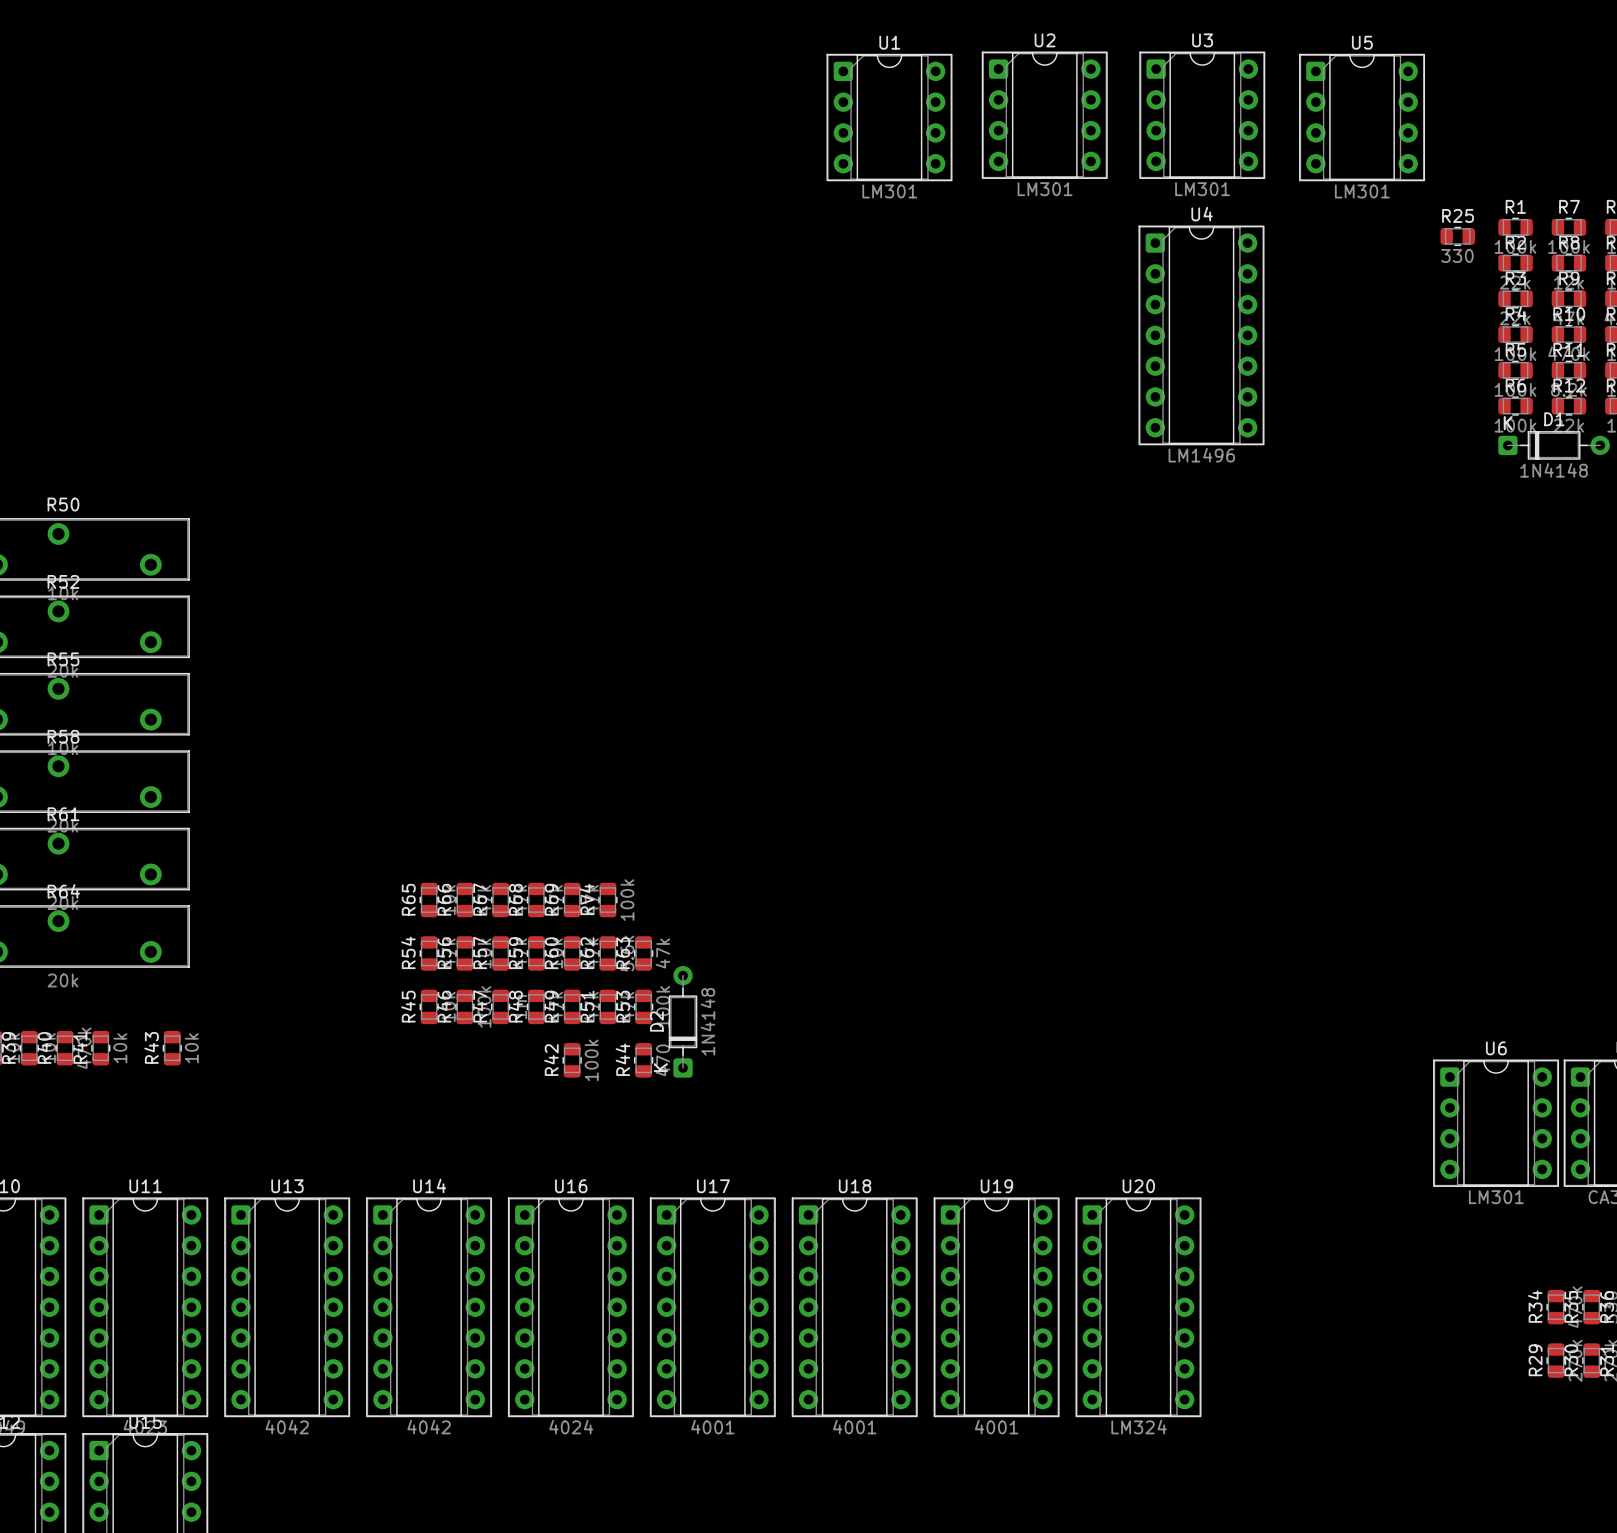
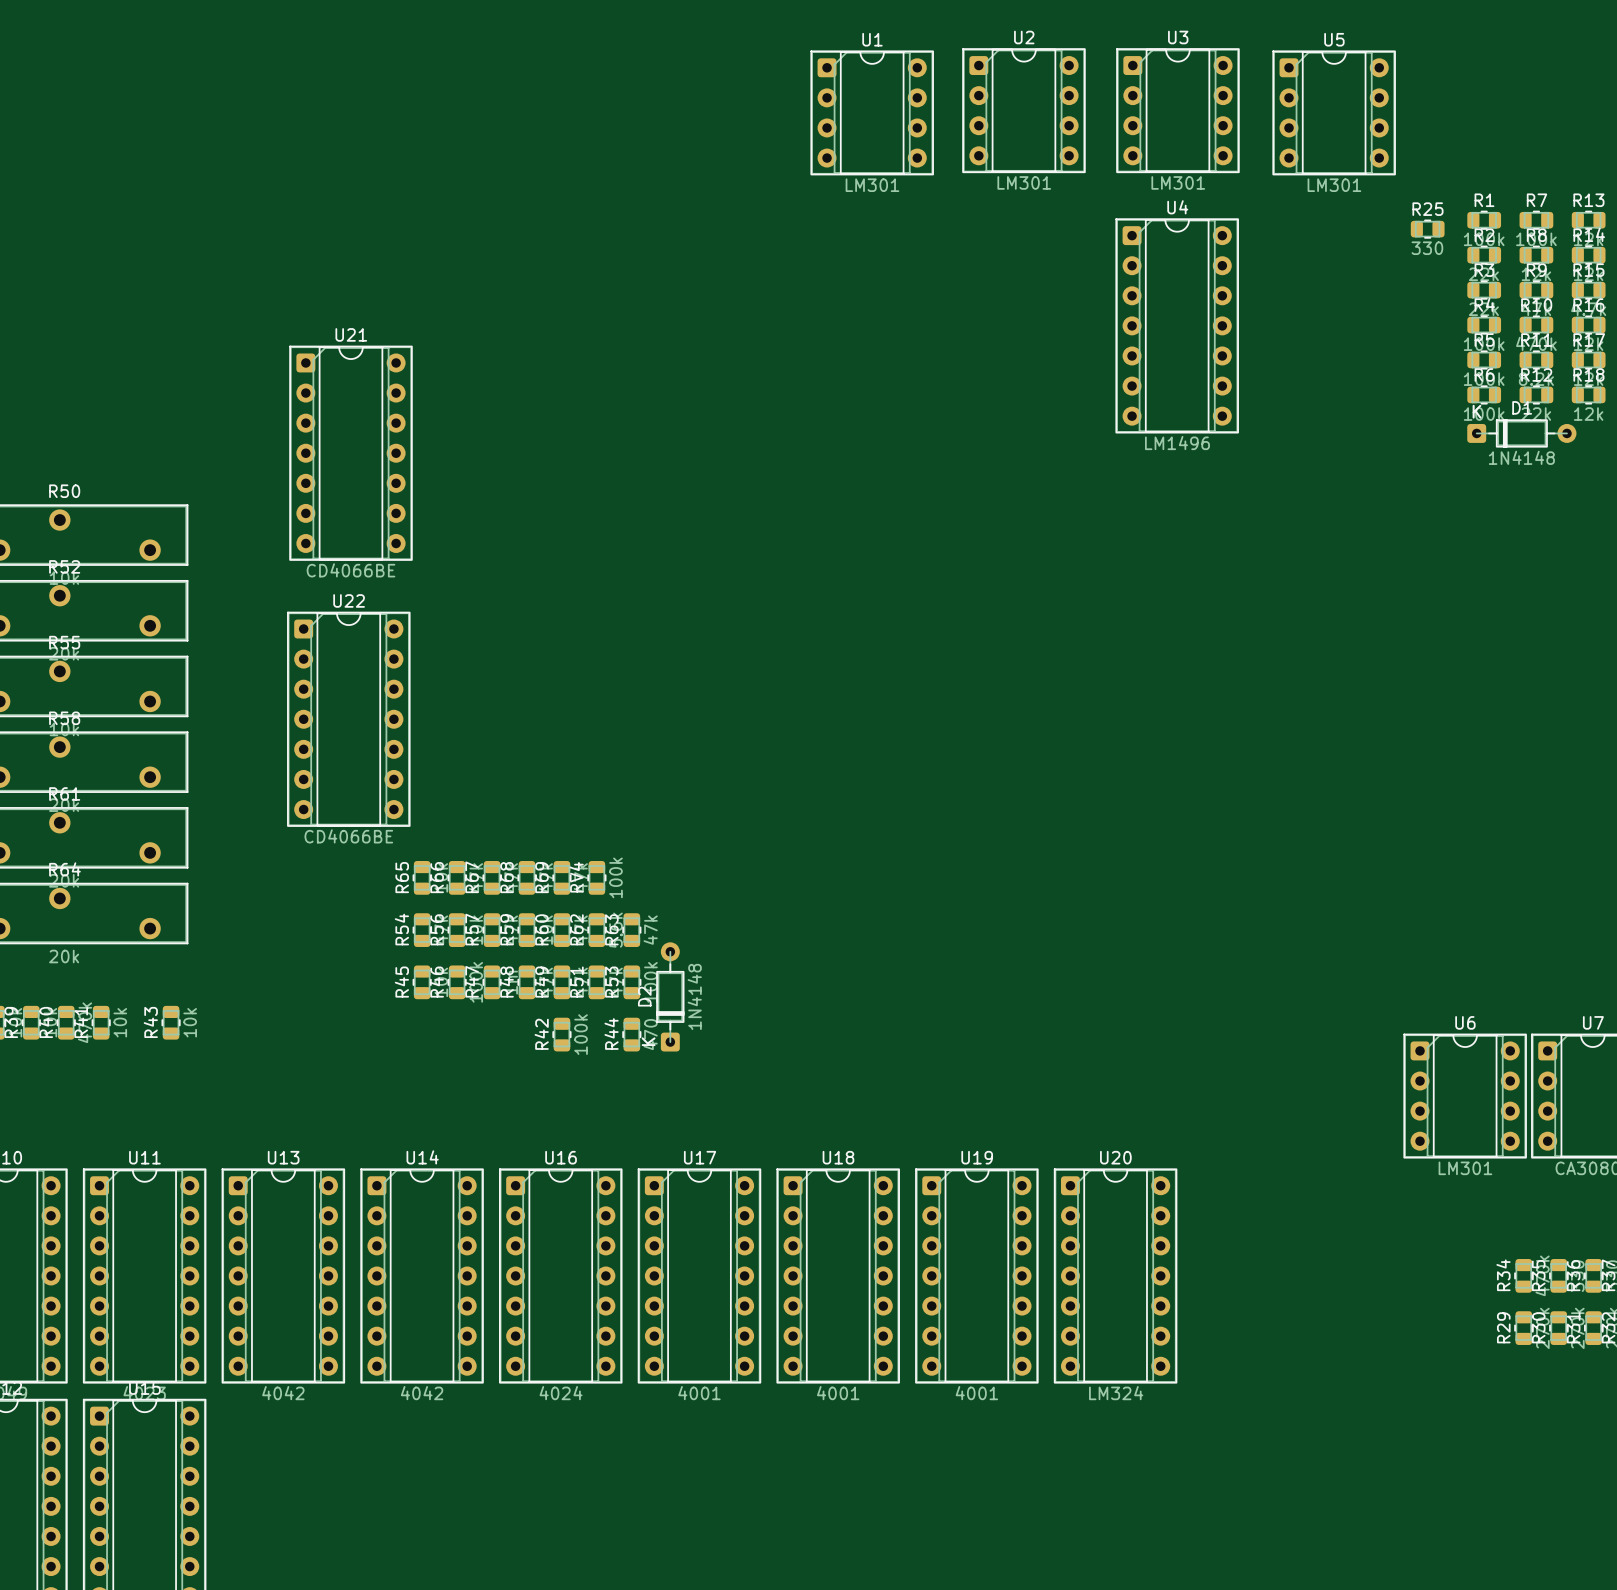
U21: none -> CD4066BE (350, 453)
U22: none -> CD4066BE (348, 719)

